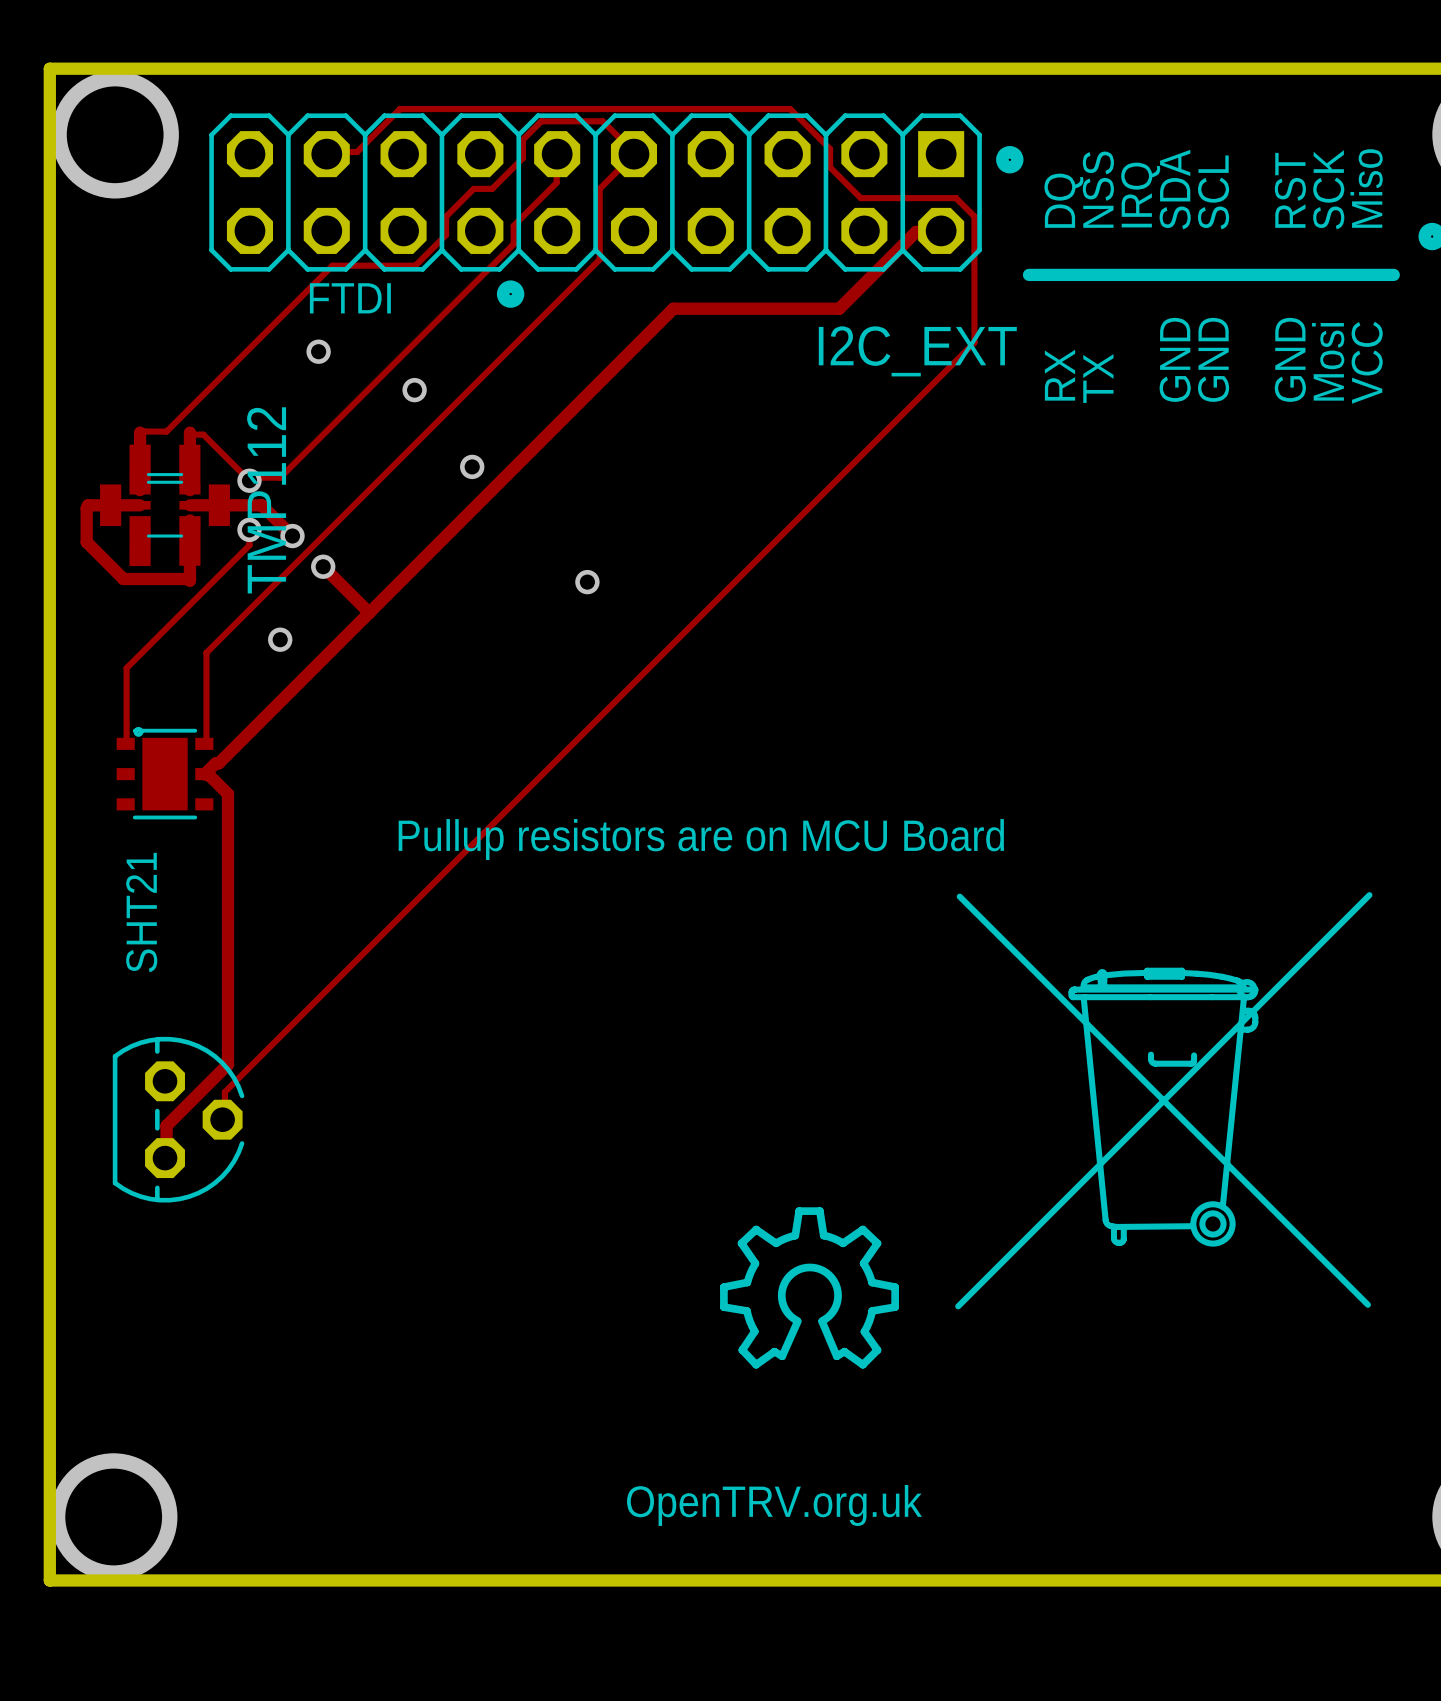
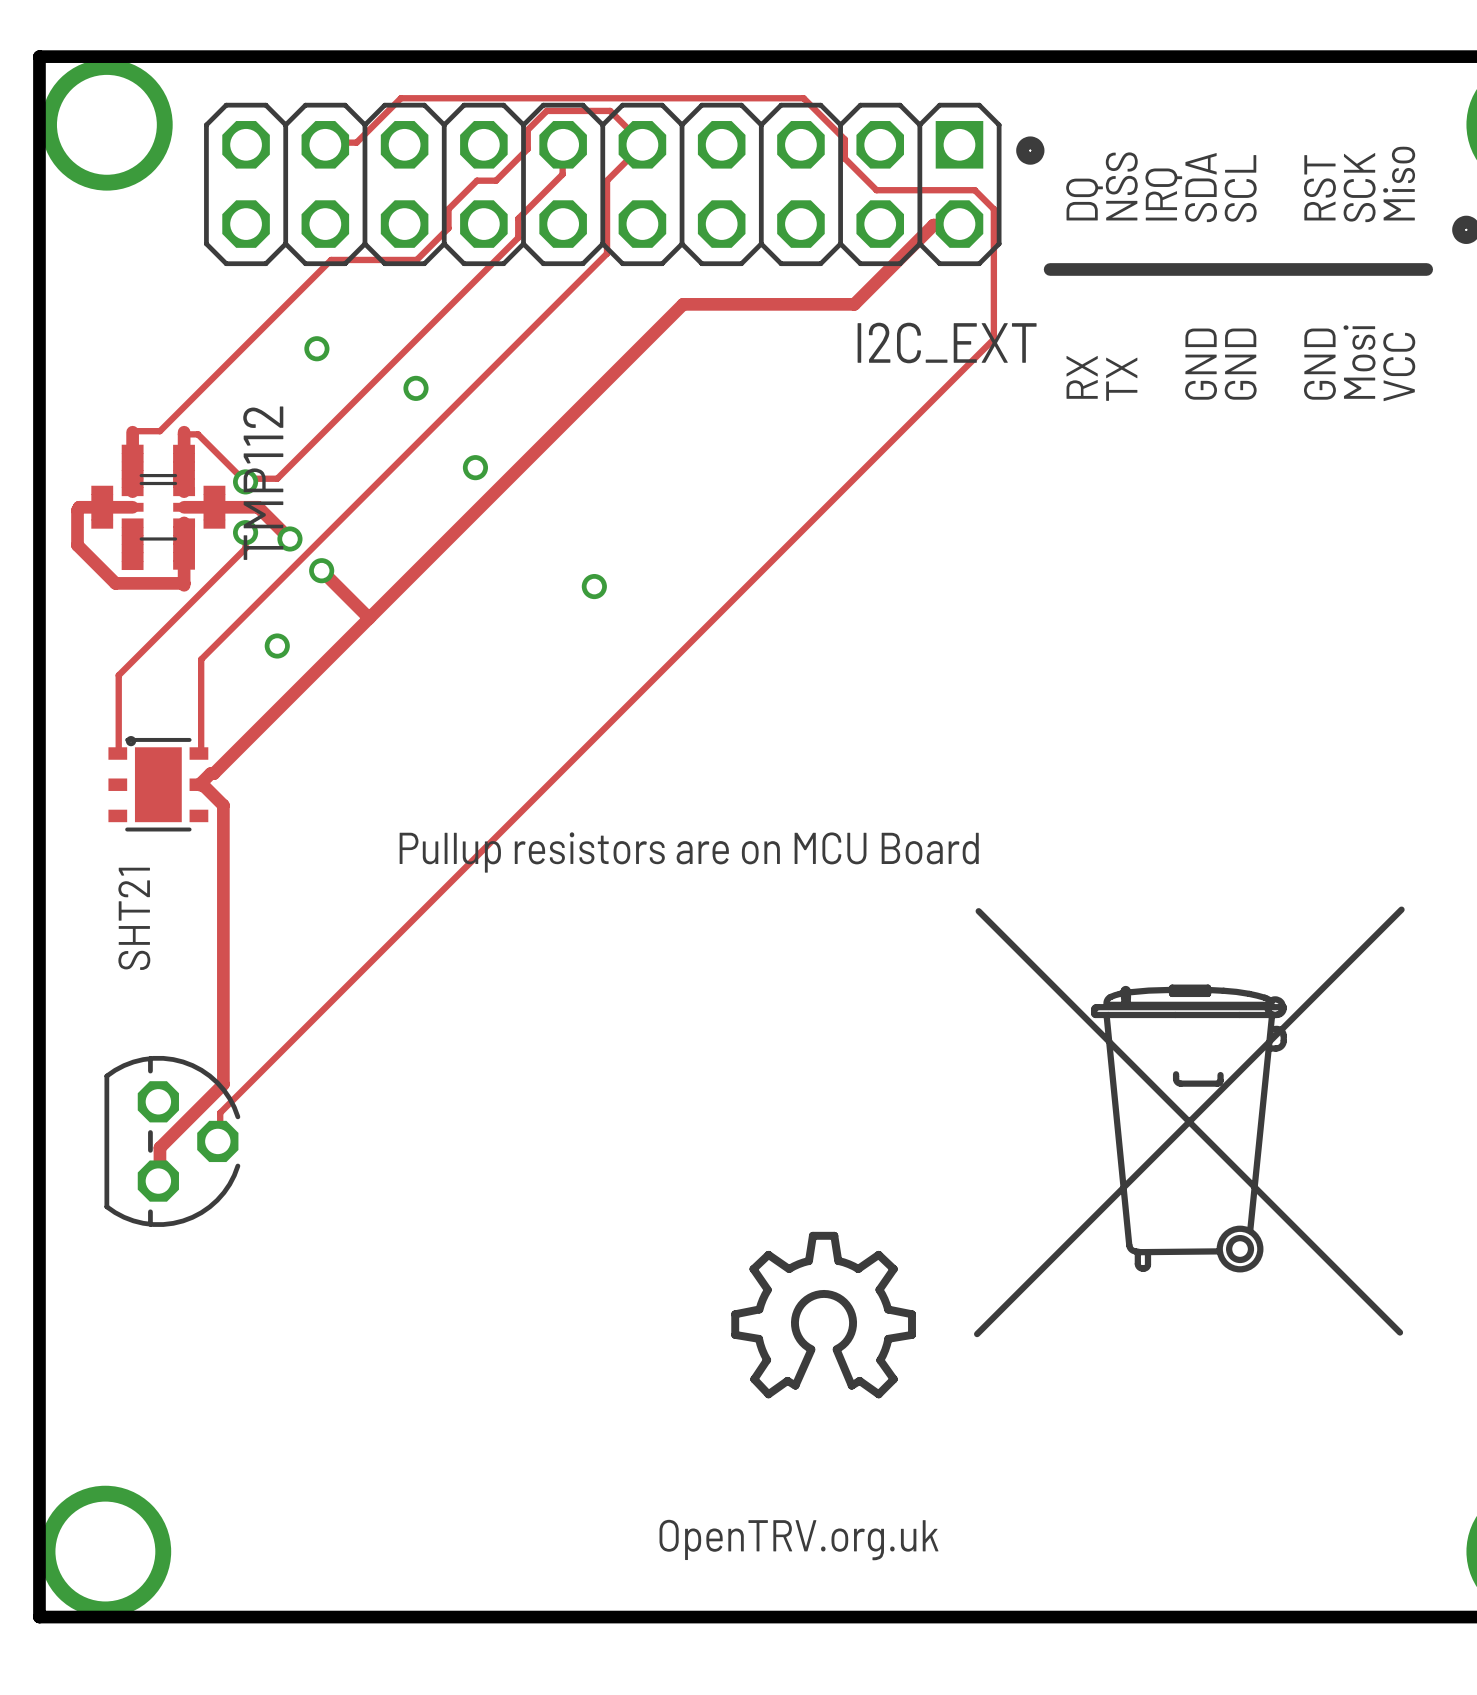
drawing: [496, 280, 525, 308] -> none
text: FTDI (350, 298) -> none

